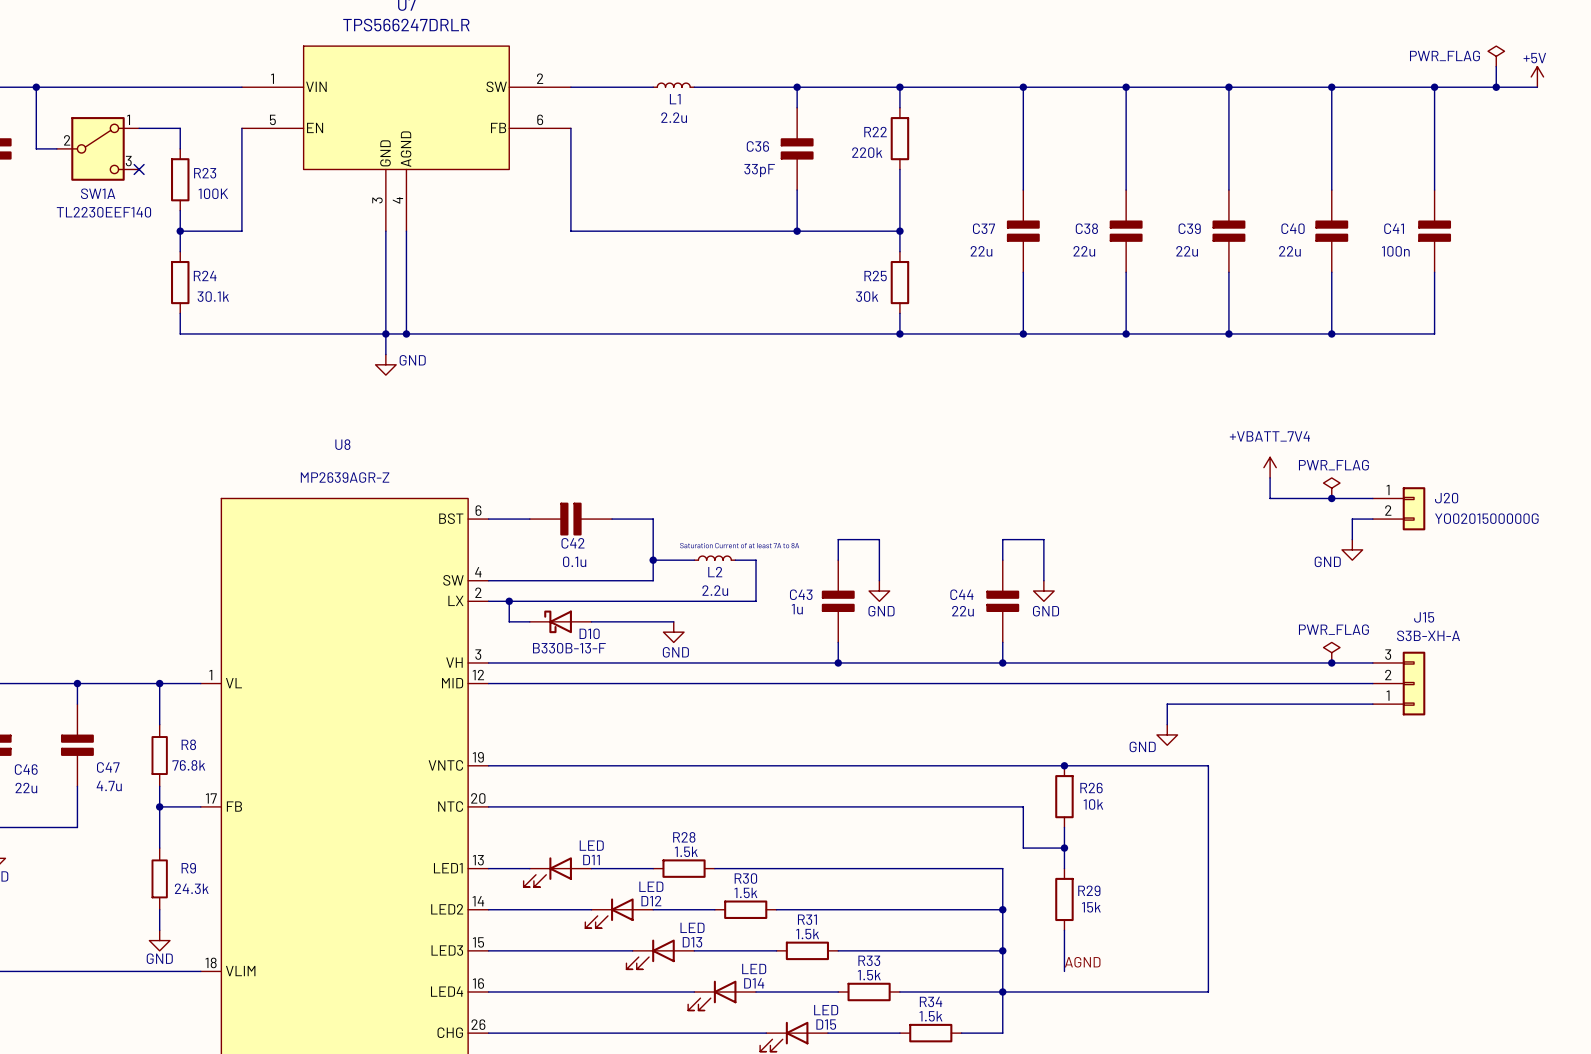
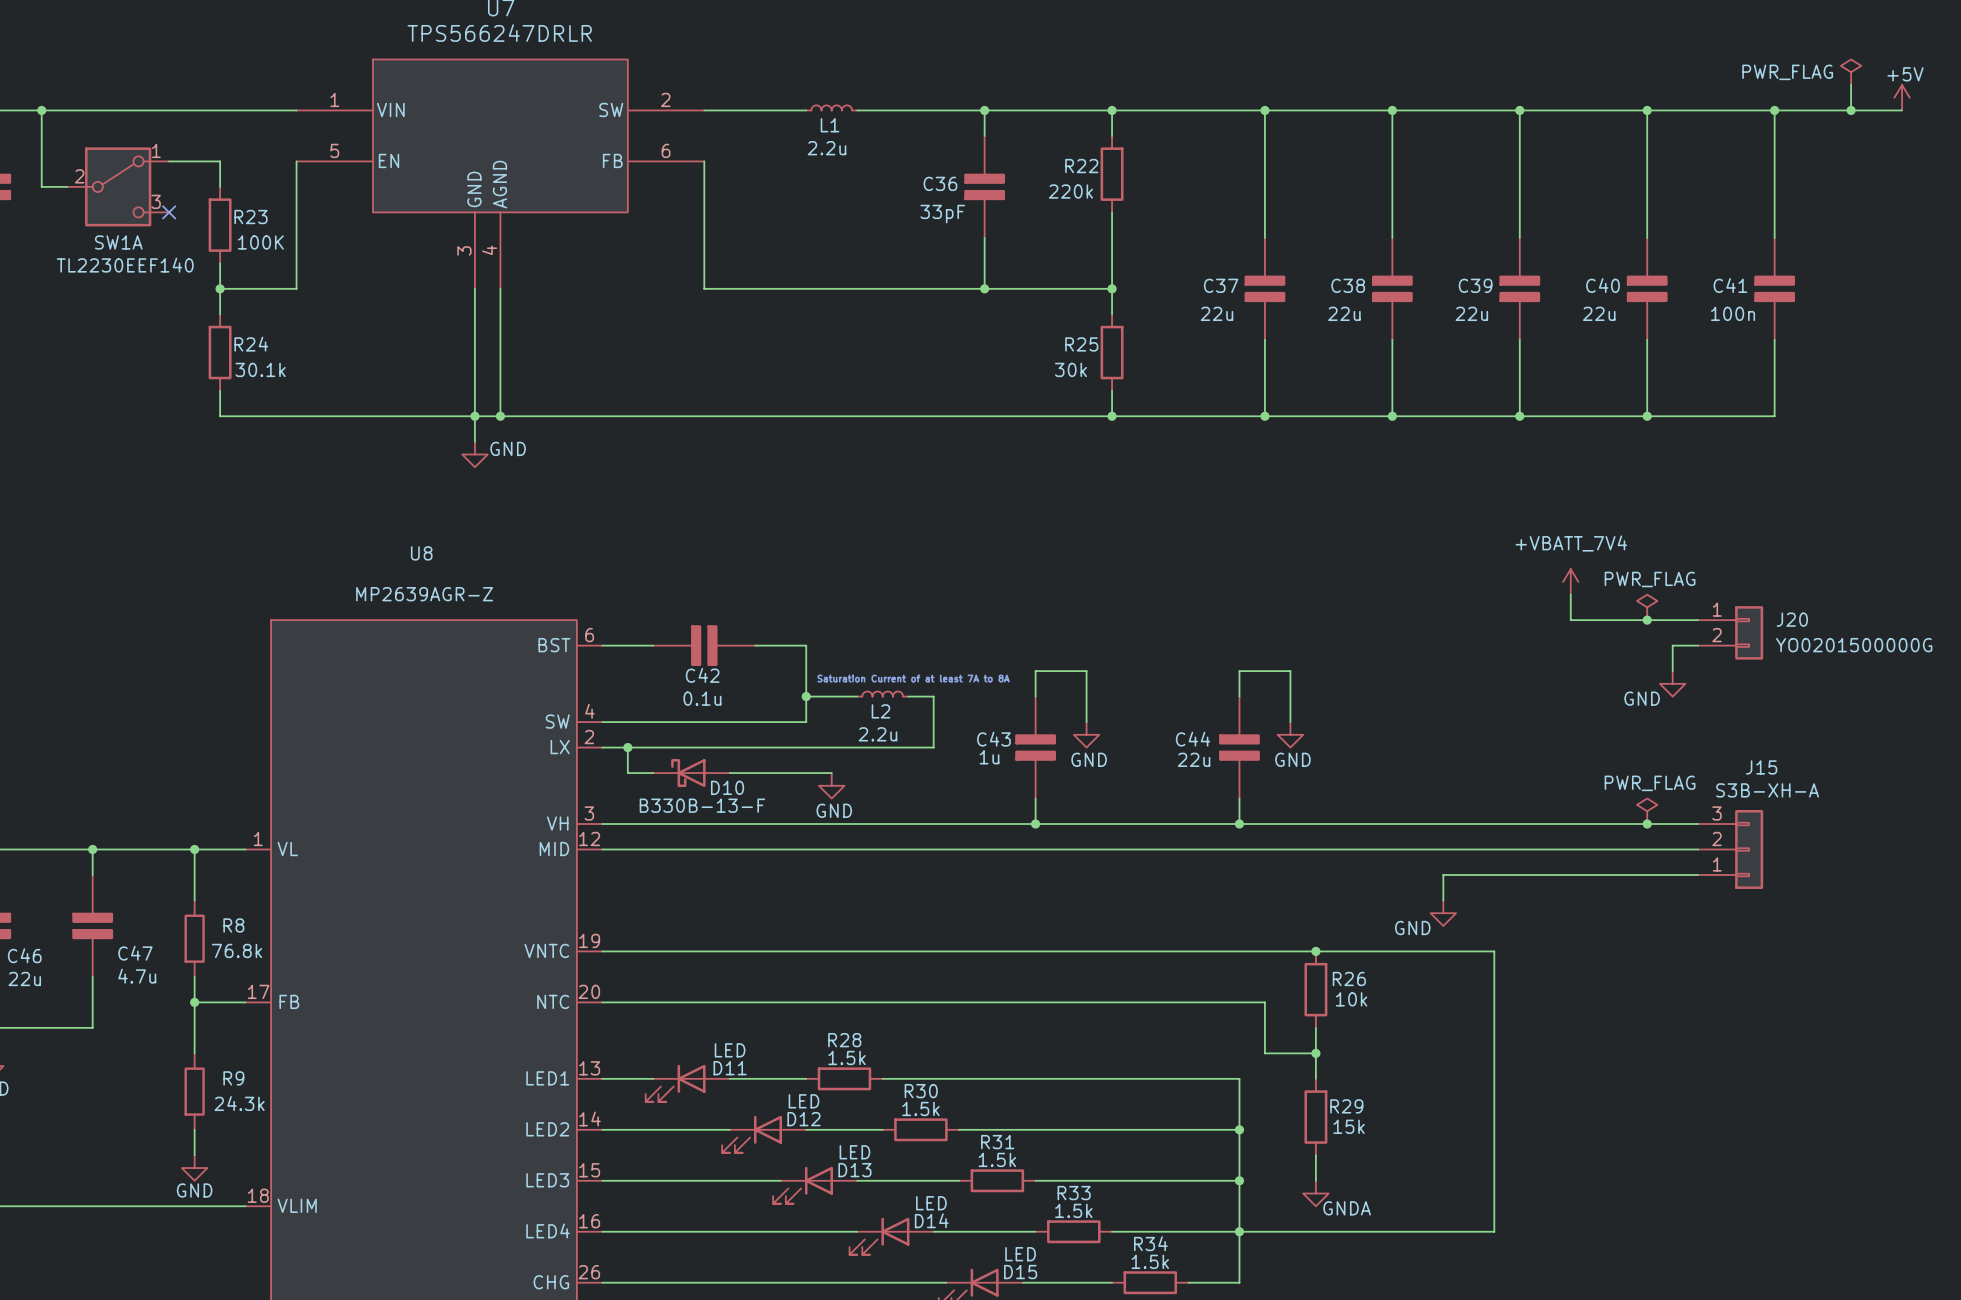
power symbol: none -> GNDA (1315, 1193)
label: AGND (1082, 962) -> none

